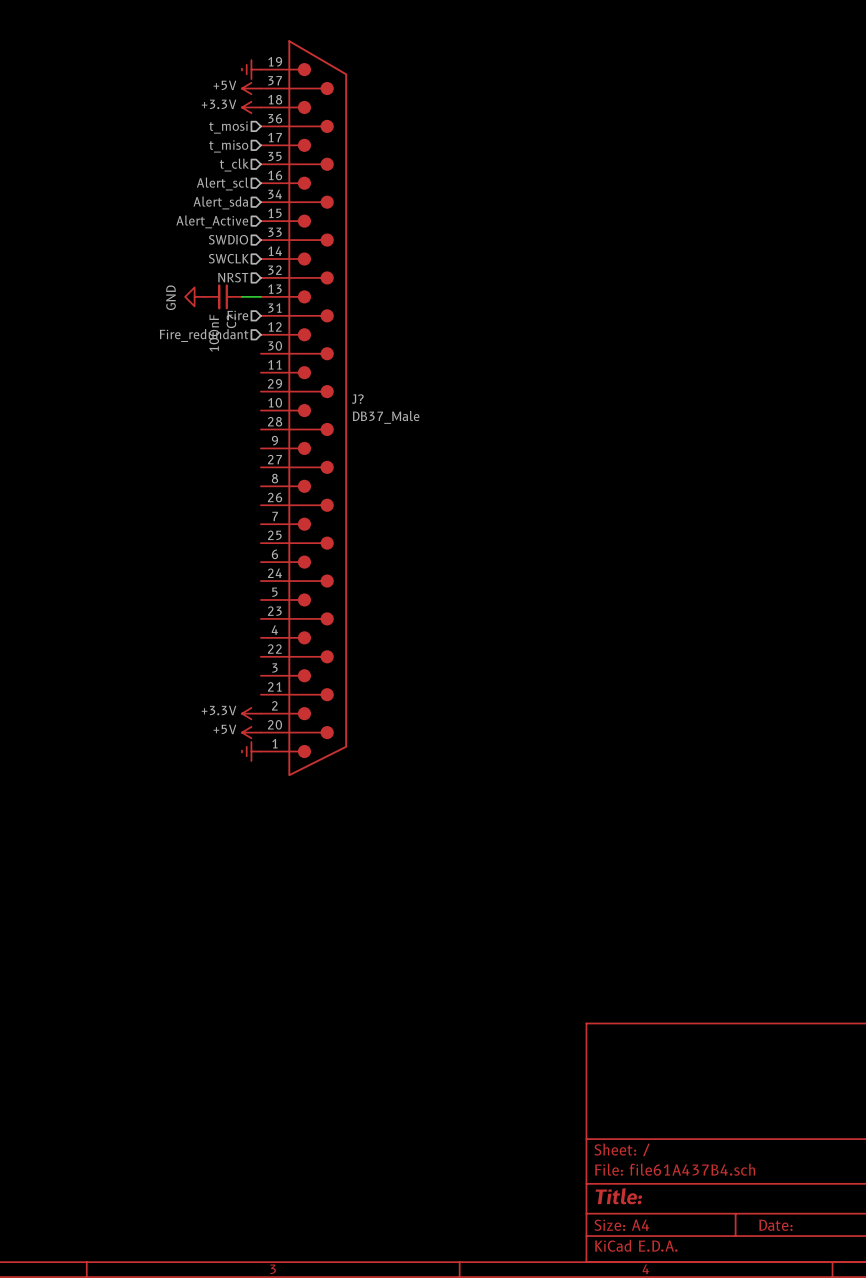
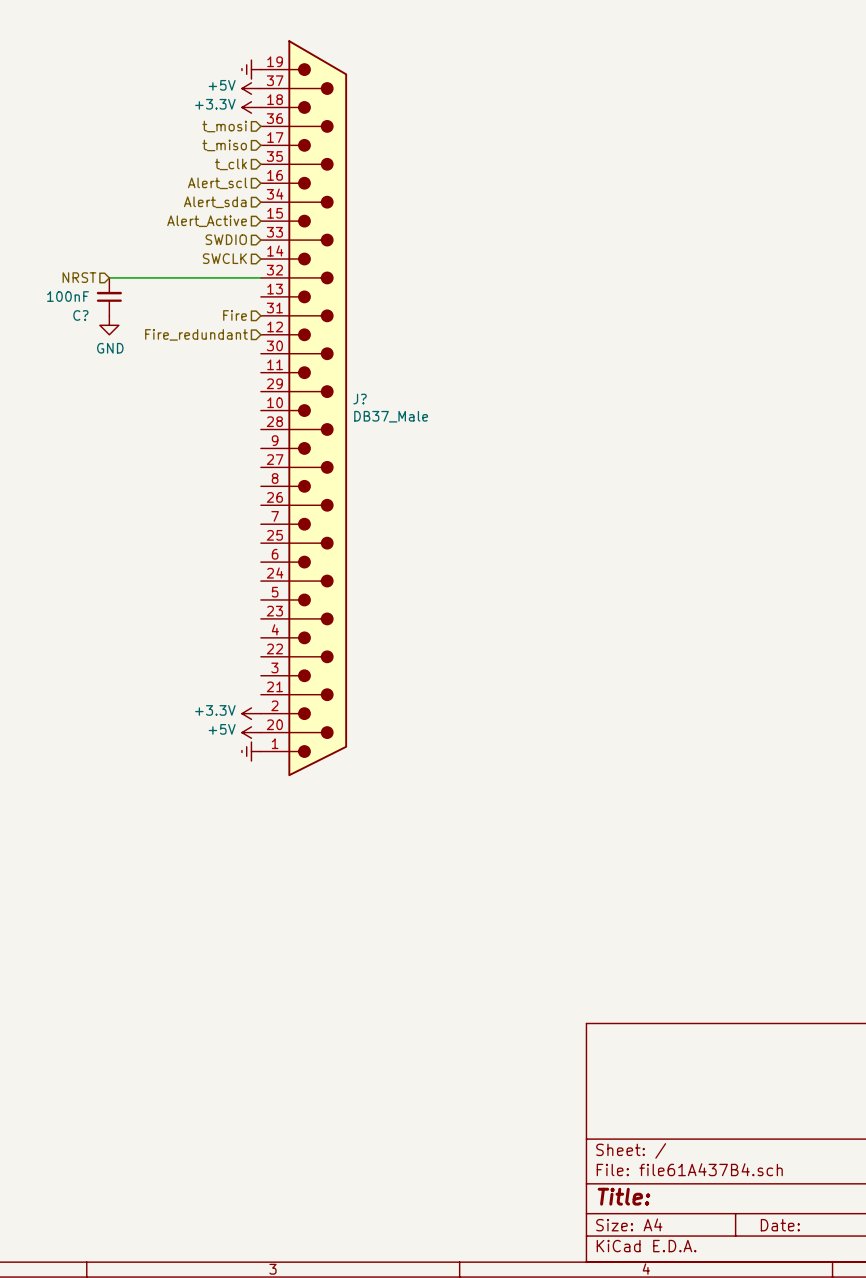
wire: none -> (109, 277) (260, 277)
hierarchical label position: NRST (233, 277) -> NRST (79, 277)
power symbol rotation: 0° (194, 296) -> 90° counterclockwise (109, 325)
power symbol position: GND (194, 296) -> GND (109, 325)
C? rotation: 0° (222, 296) -> 90° clockwise (109, 296)
C? position: (223, 296) -> (109, 296)
wire: (241, 296) (260, 296) -> none

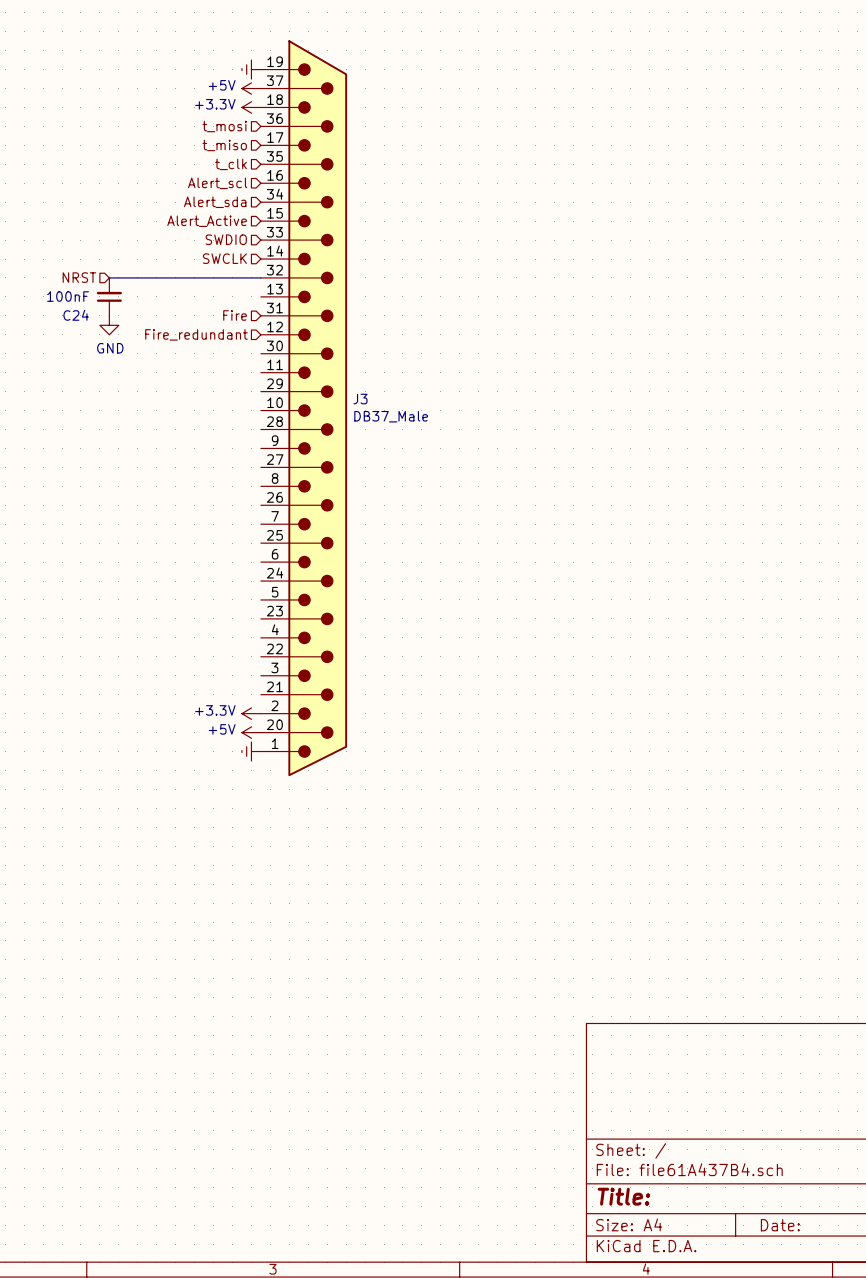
C? name: C? (80, 315) -> C24 (76, 315)
J? name: J? (360, 399) -> J3 (360, 399)

